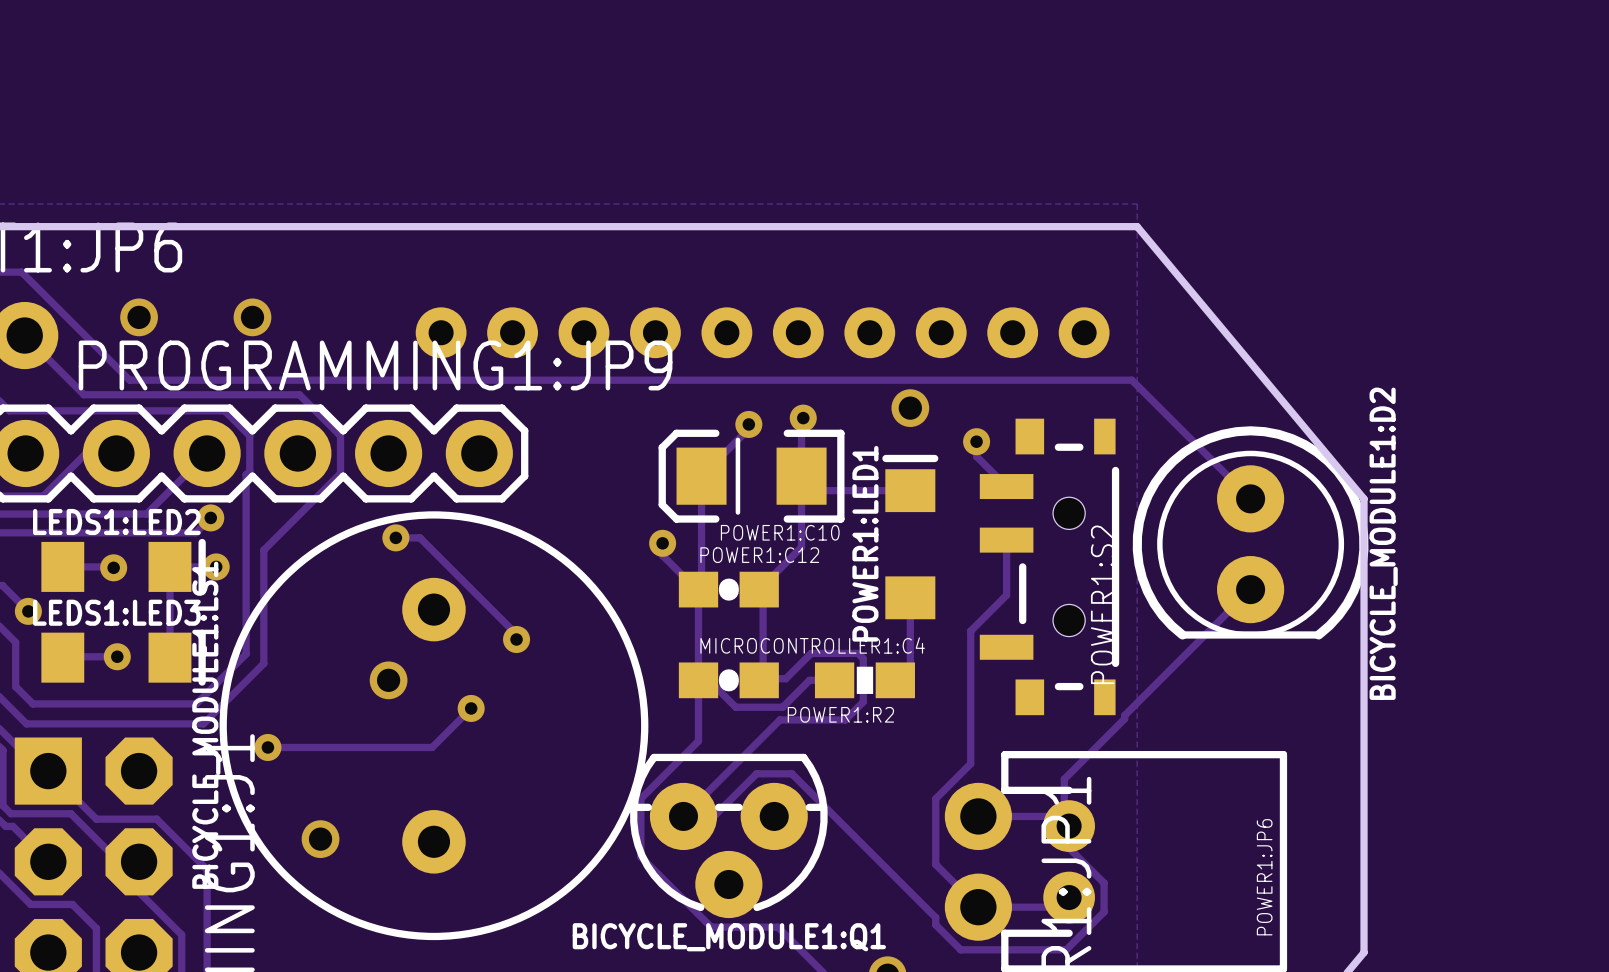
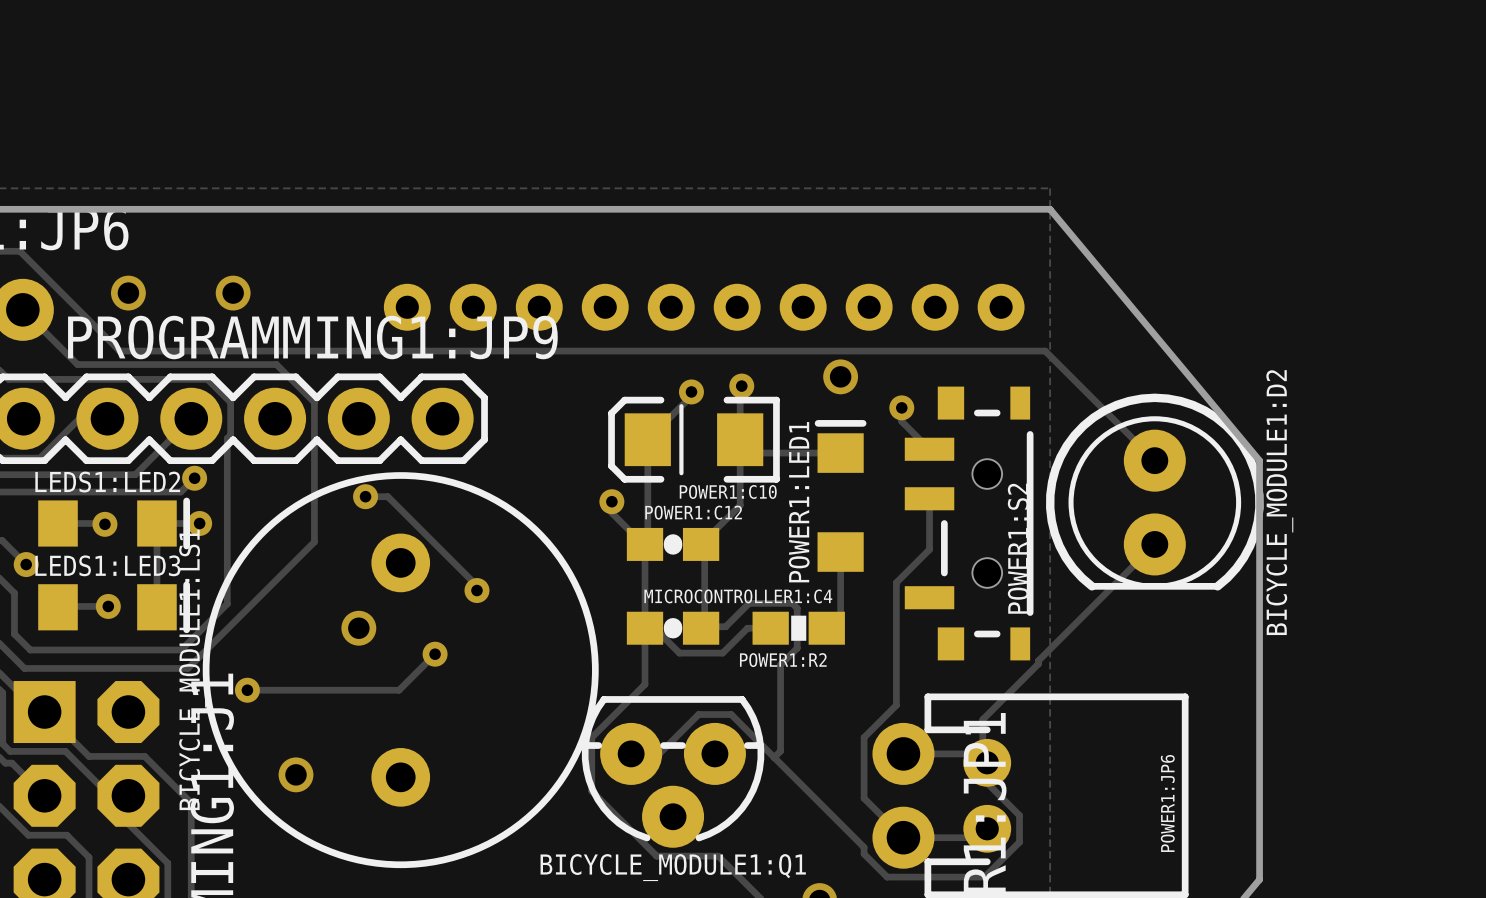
track: (340, 473) (263, 550) (263, 663) -> (314, 437) (314, 541) (243, 612)
track: (845, 719) (779, 719) (683, 816) -> (780, 664) (780, 751) (774, 757)

